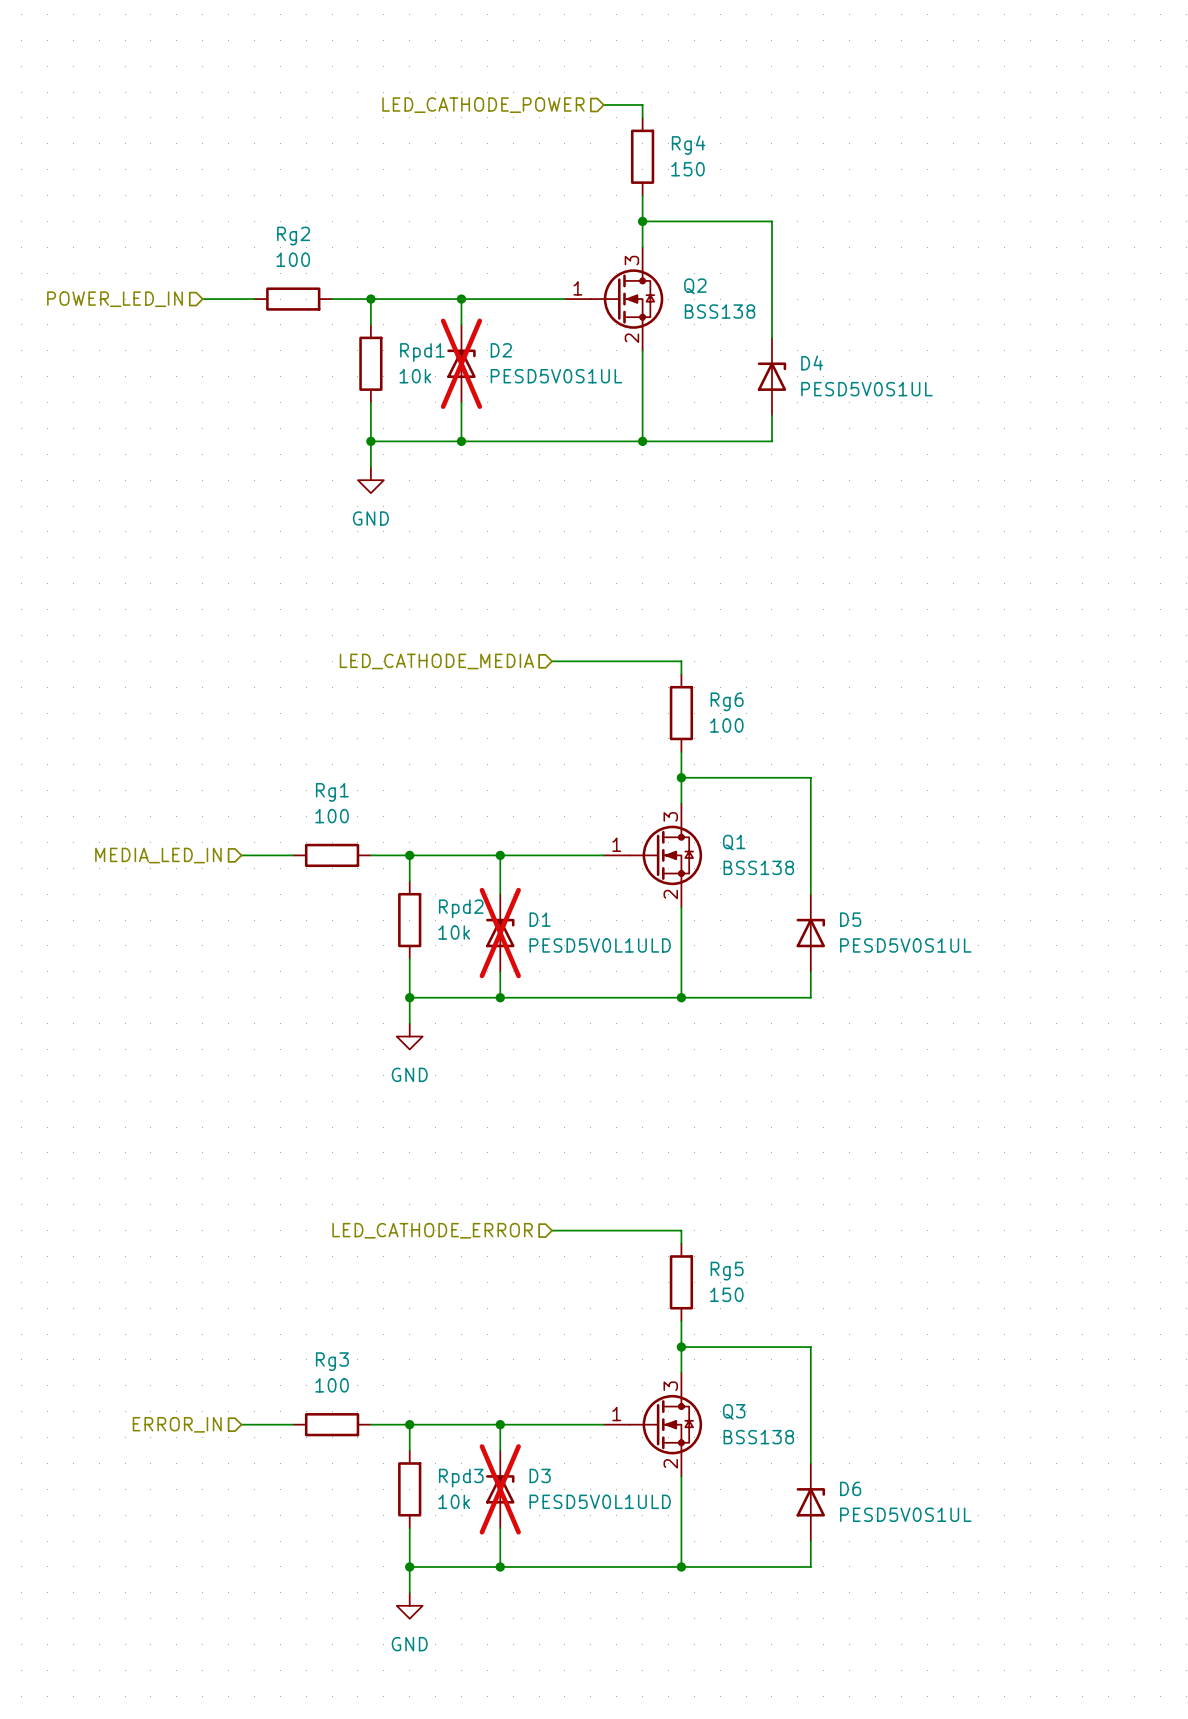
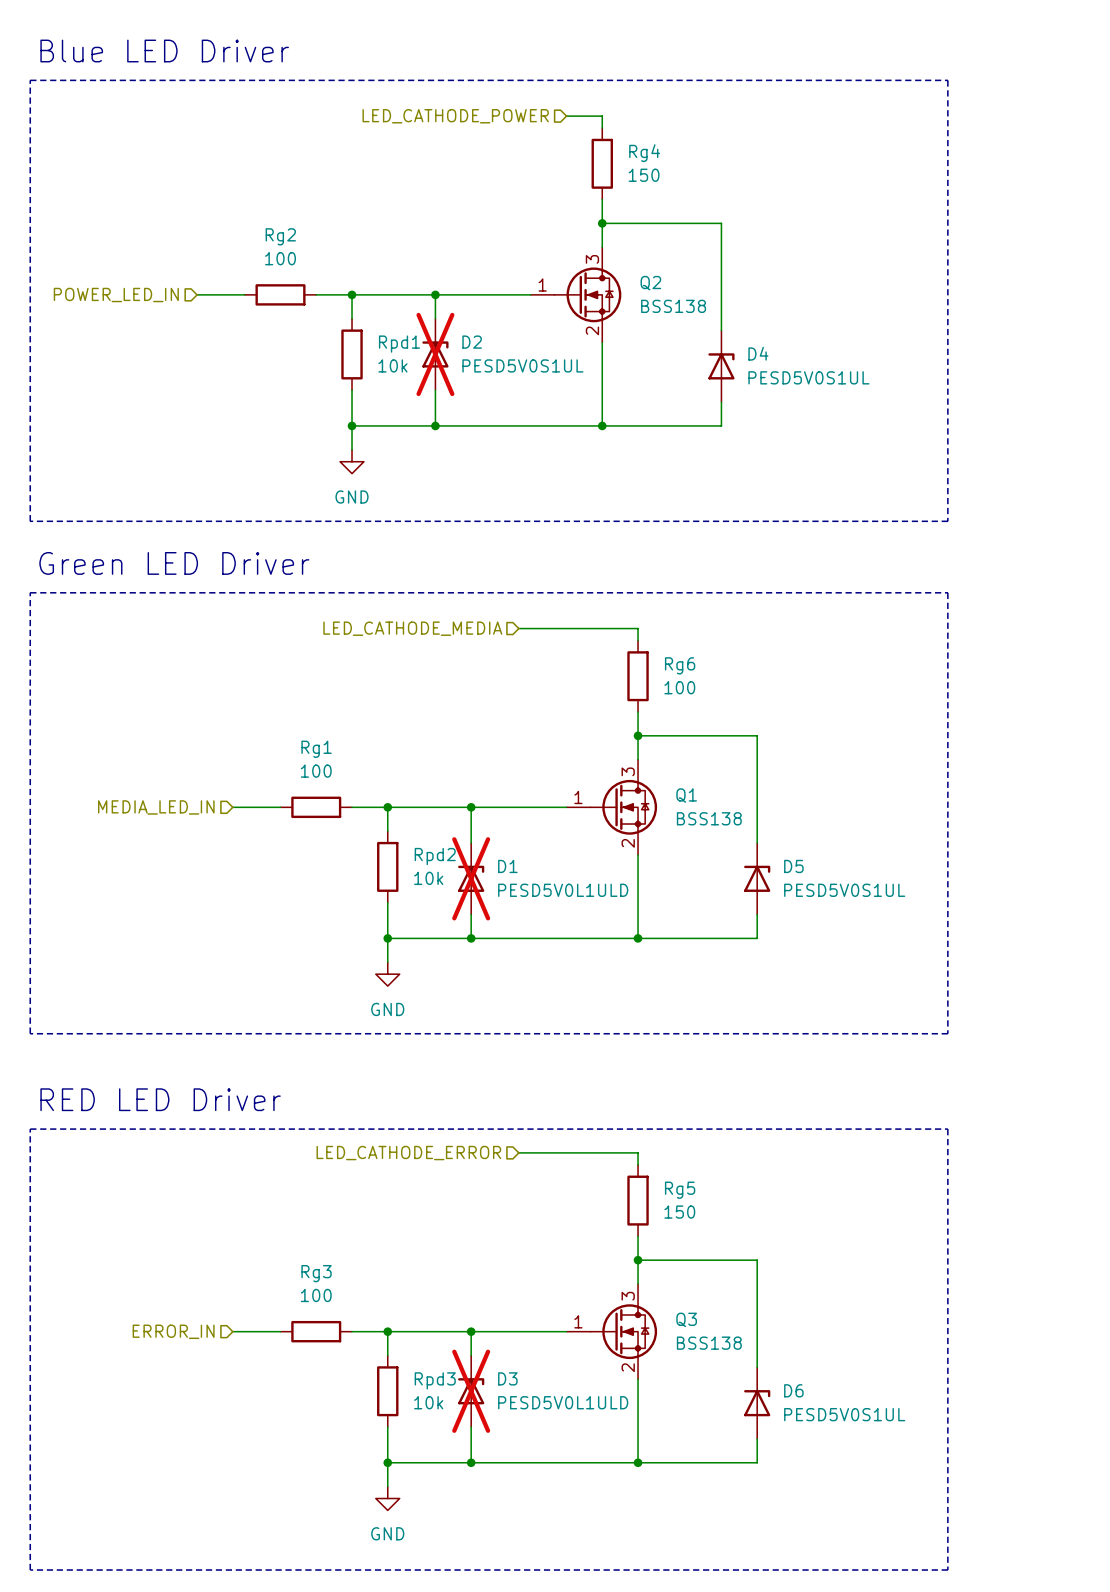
text: none -> Blue LED Driver (164, 51)
line: none -> (30, 80) (30, 521) (947, 521) (947, 80) (30, 80)
text: none -> Green LED Driver (174, 563)
line: none -> (30, 592) (947, 592) (947, 1033) (30, 1033) (30, 592)
text: none -> RED LED Driver (160, 1099)
line: none -> (30, 1129) (30, 1570) (947, 1570) (947, 1129) (30, 1129)

